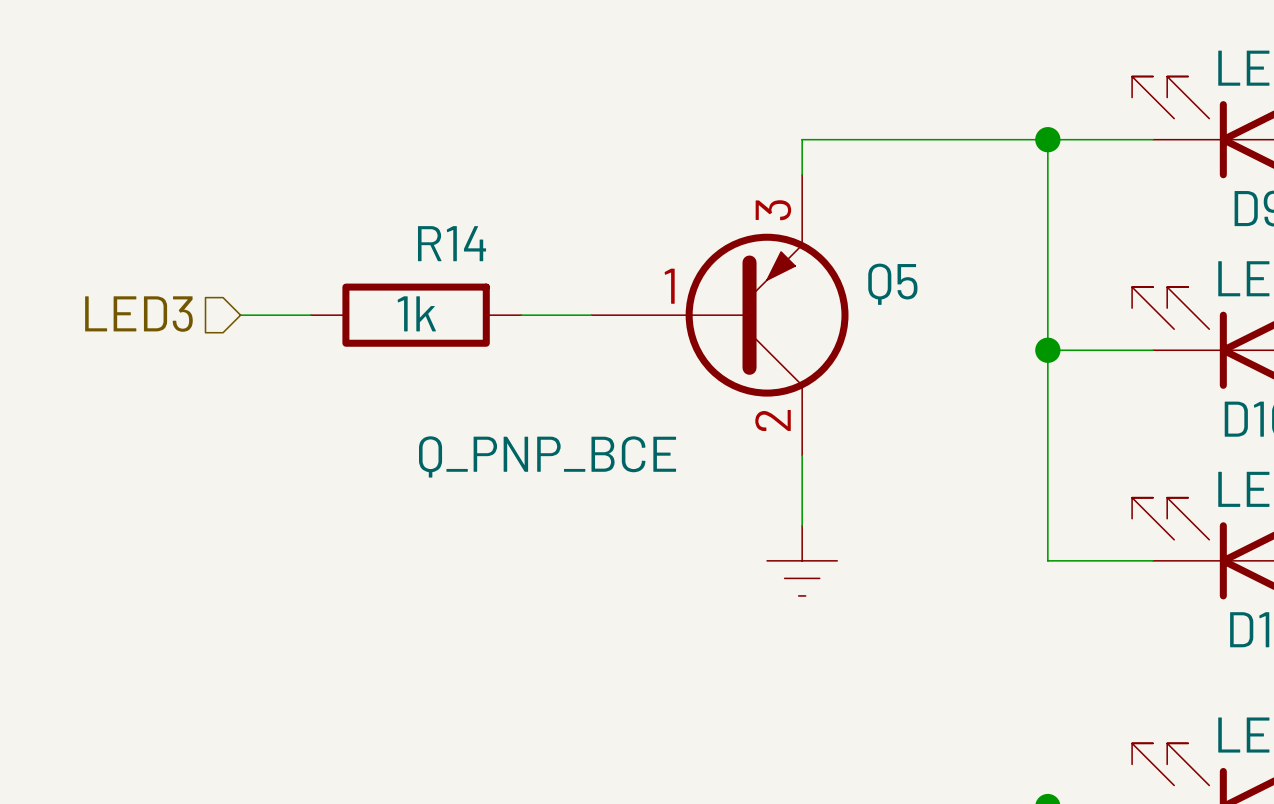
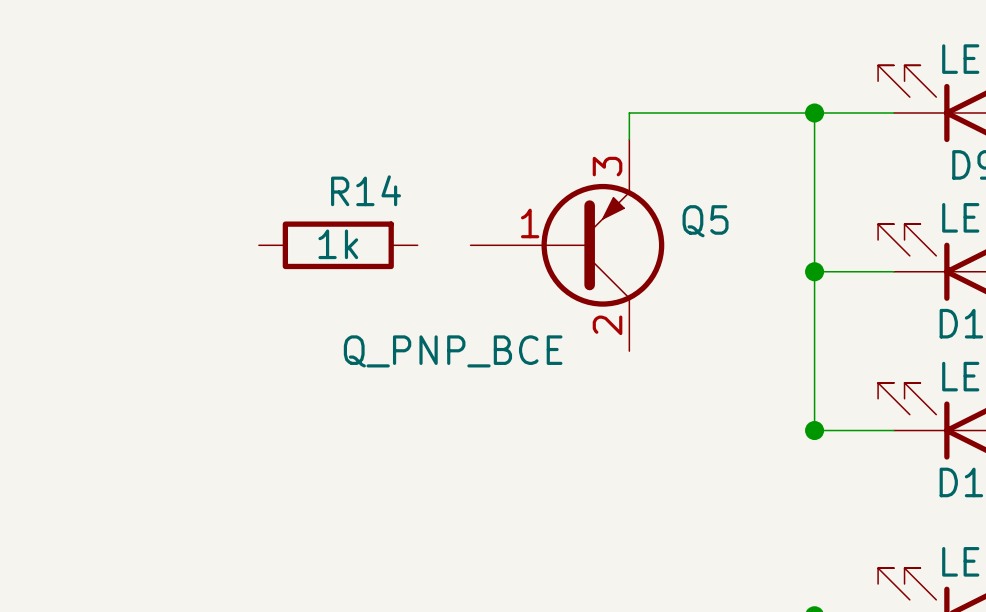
hierarchical label: LED3 (138, 314) -> none
wire: (240, 315) (310, 315) -> none
wire: (521, 315) (591, 315) -> none
wire: (802, 455) (802, 525) -> none
power symbol: (802, 560) -> none
junction: none -> (814, 430)

